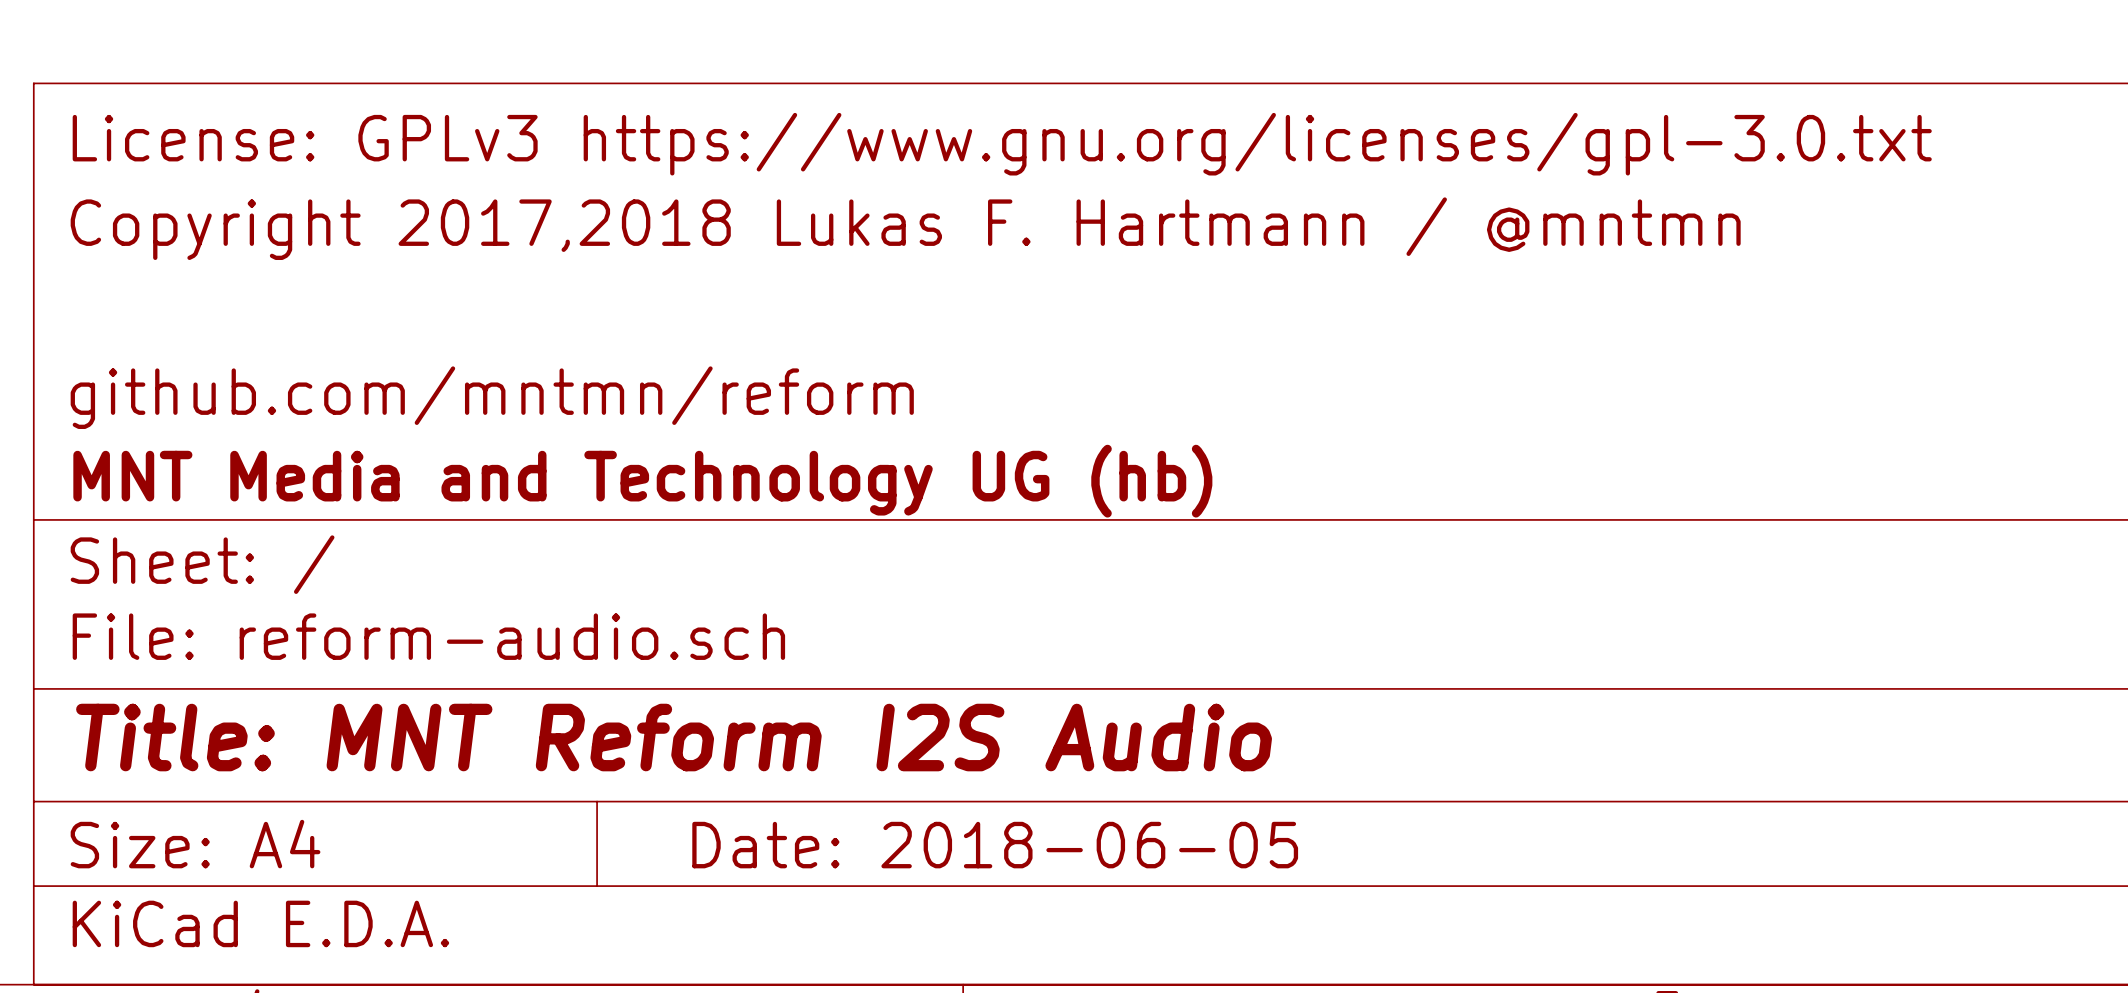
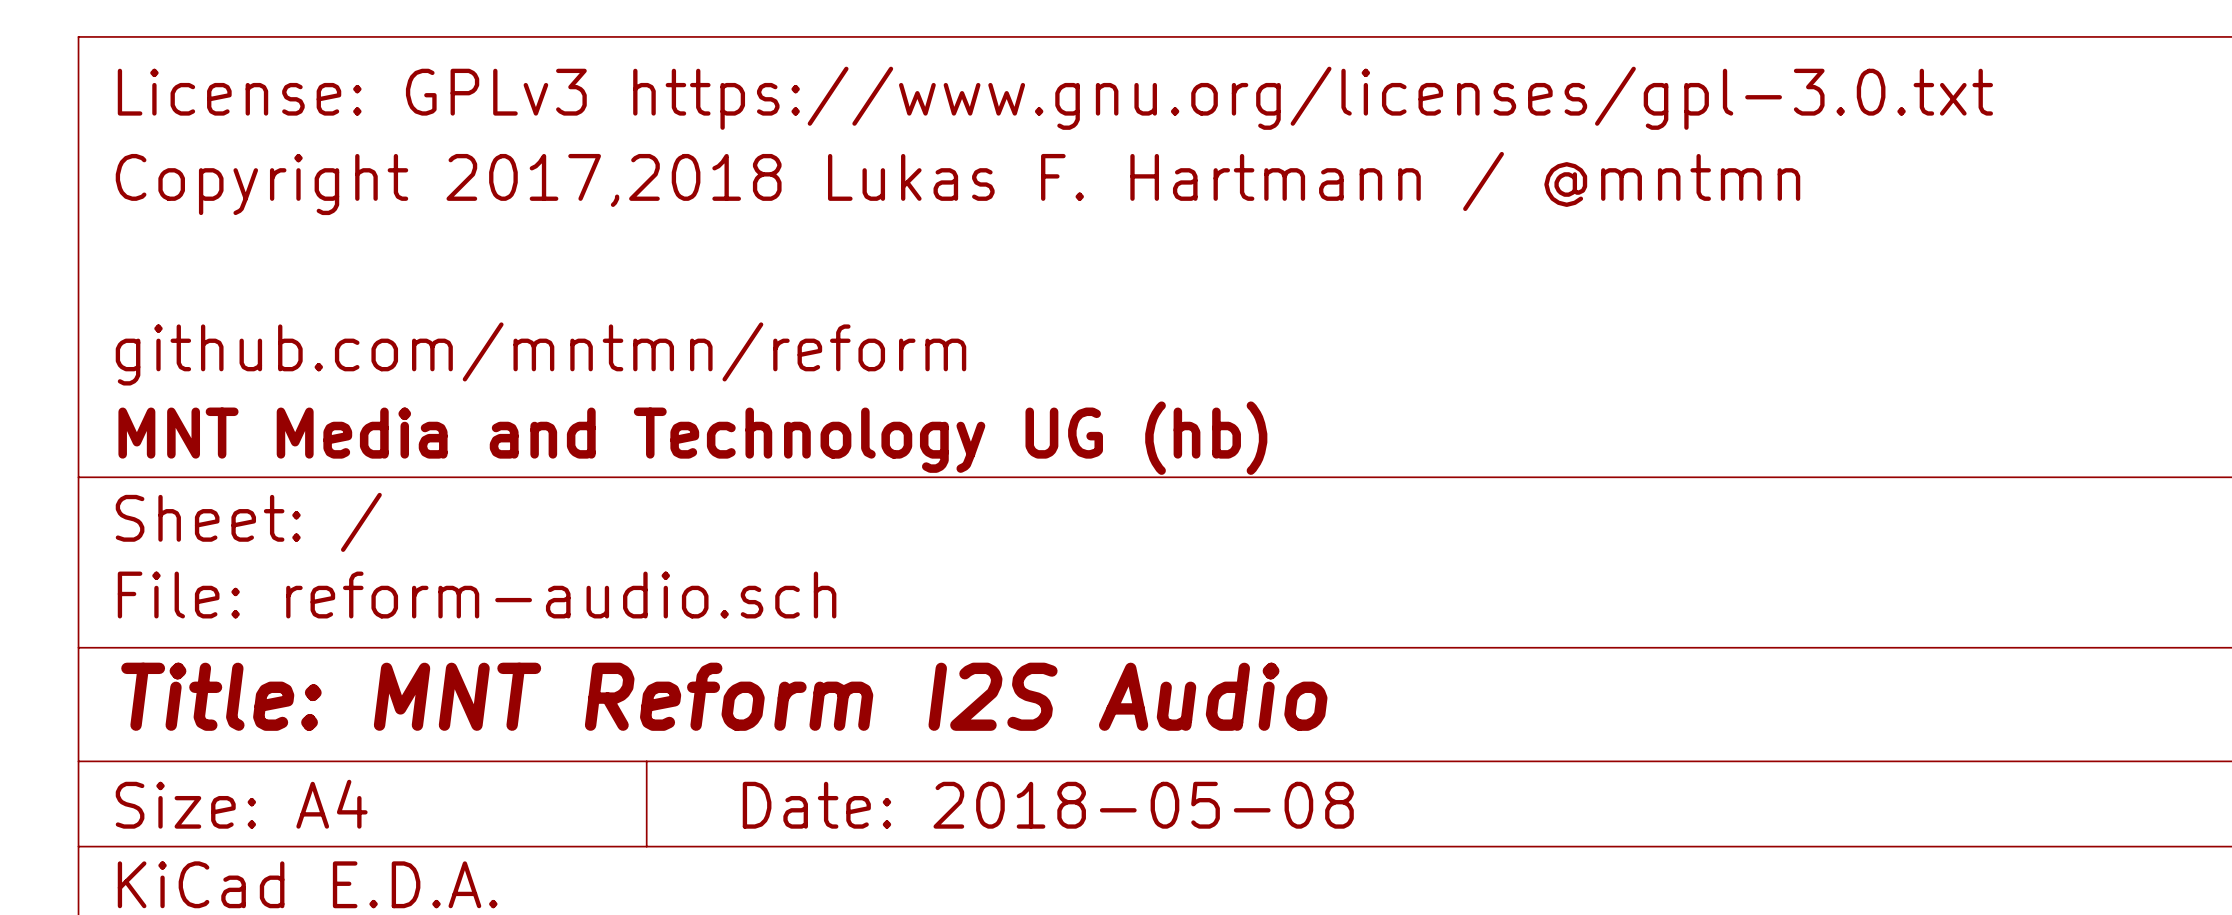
title block: Date: 2018-06-05 (995, 845) -> Date: 2018-05-08 (1048, 805)

